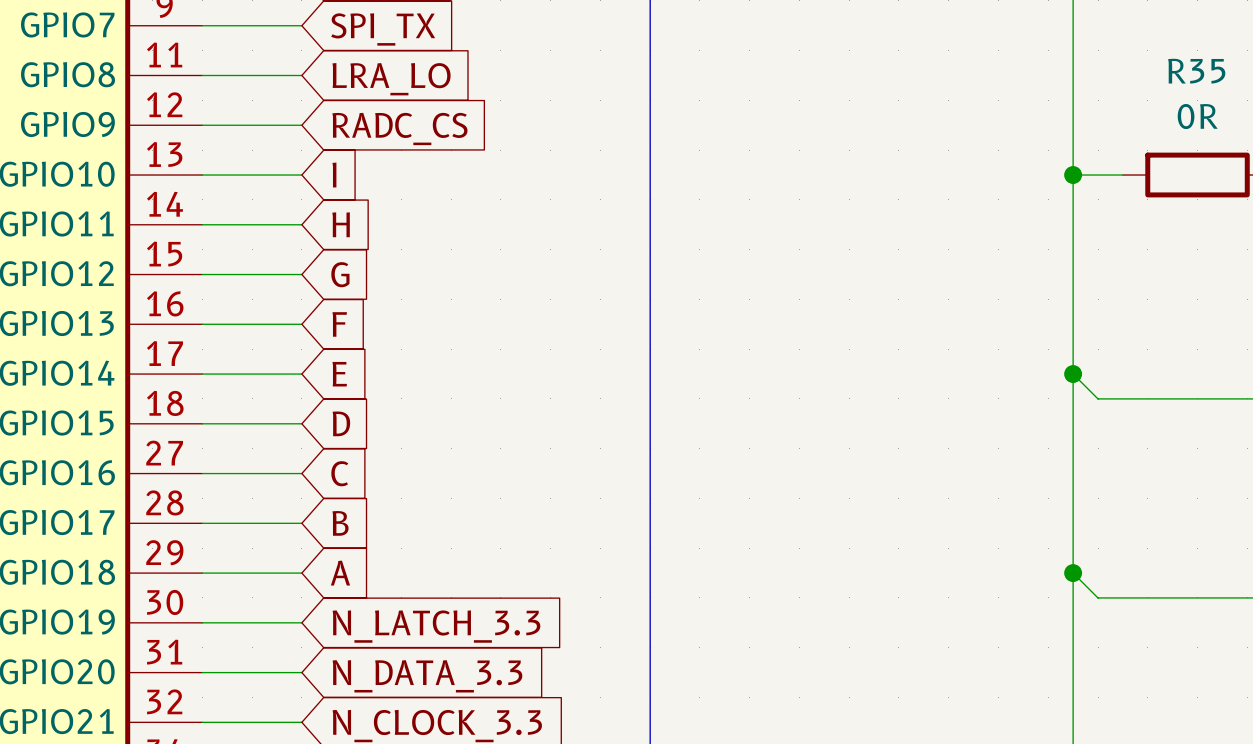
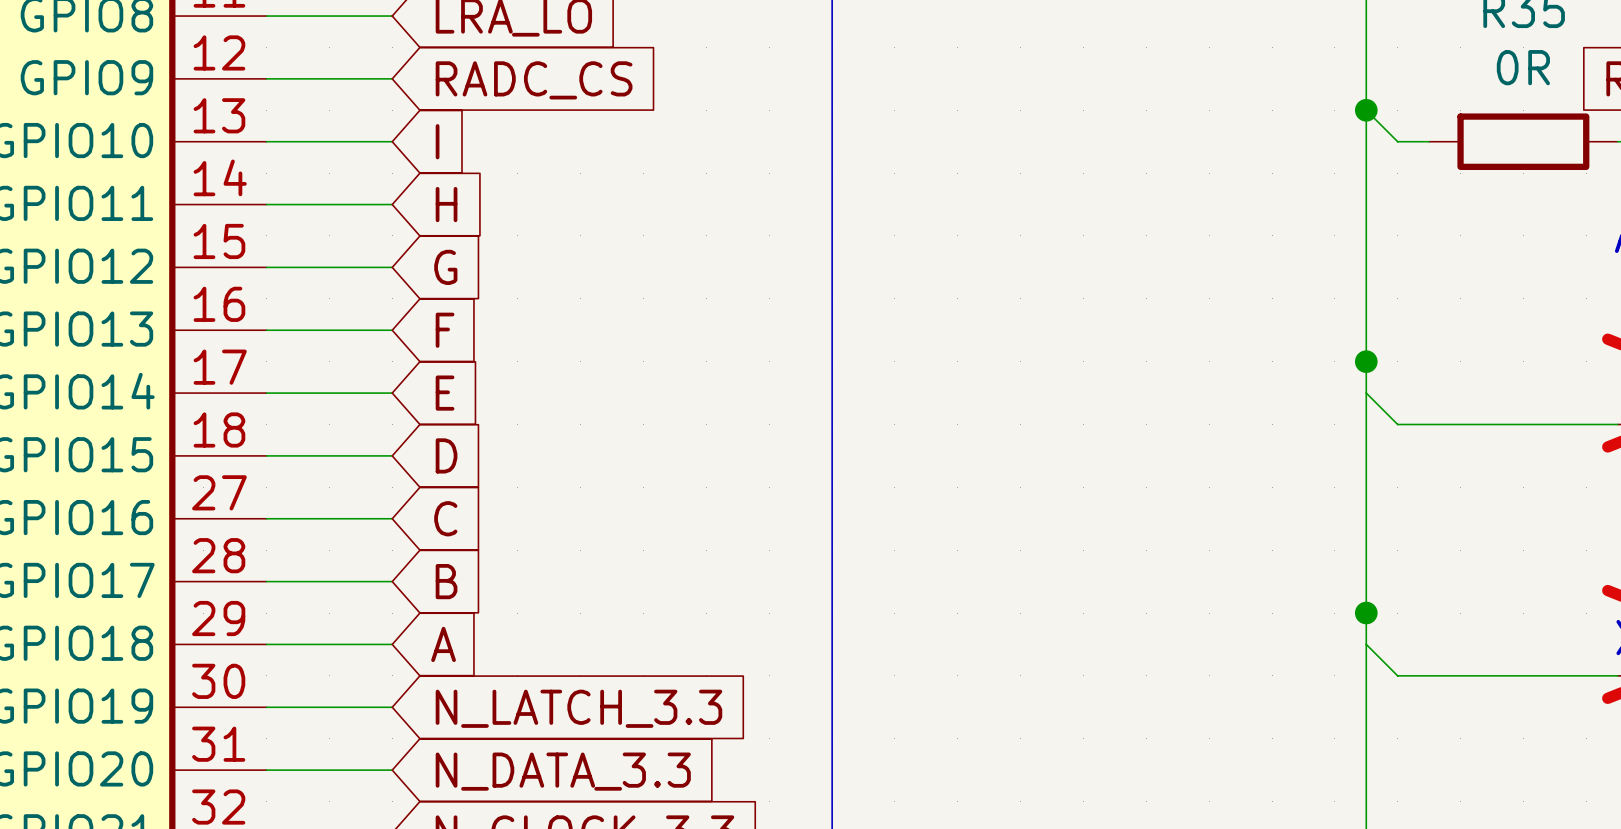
wire: (1073, 175) (1098, 175) -> (1366, 110) (1397, 141)
junction position: (1073, 175) -> (1366, 110)
junction position: (1073, 374) -> (1366, 361)
junction position: (1073, 573) -> (1366, 613)

